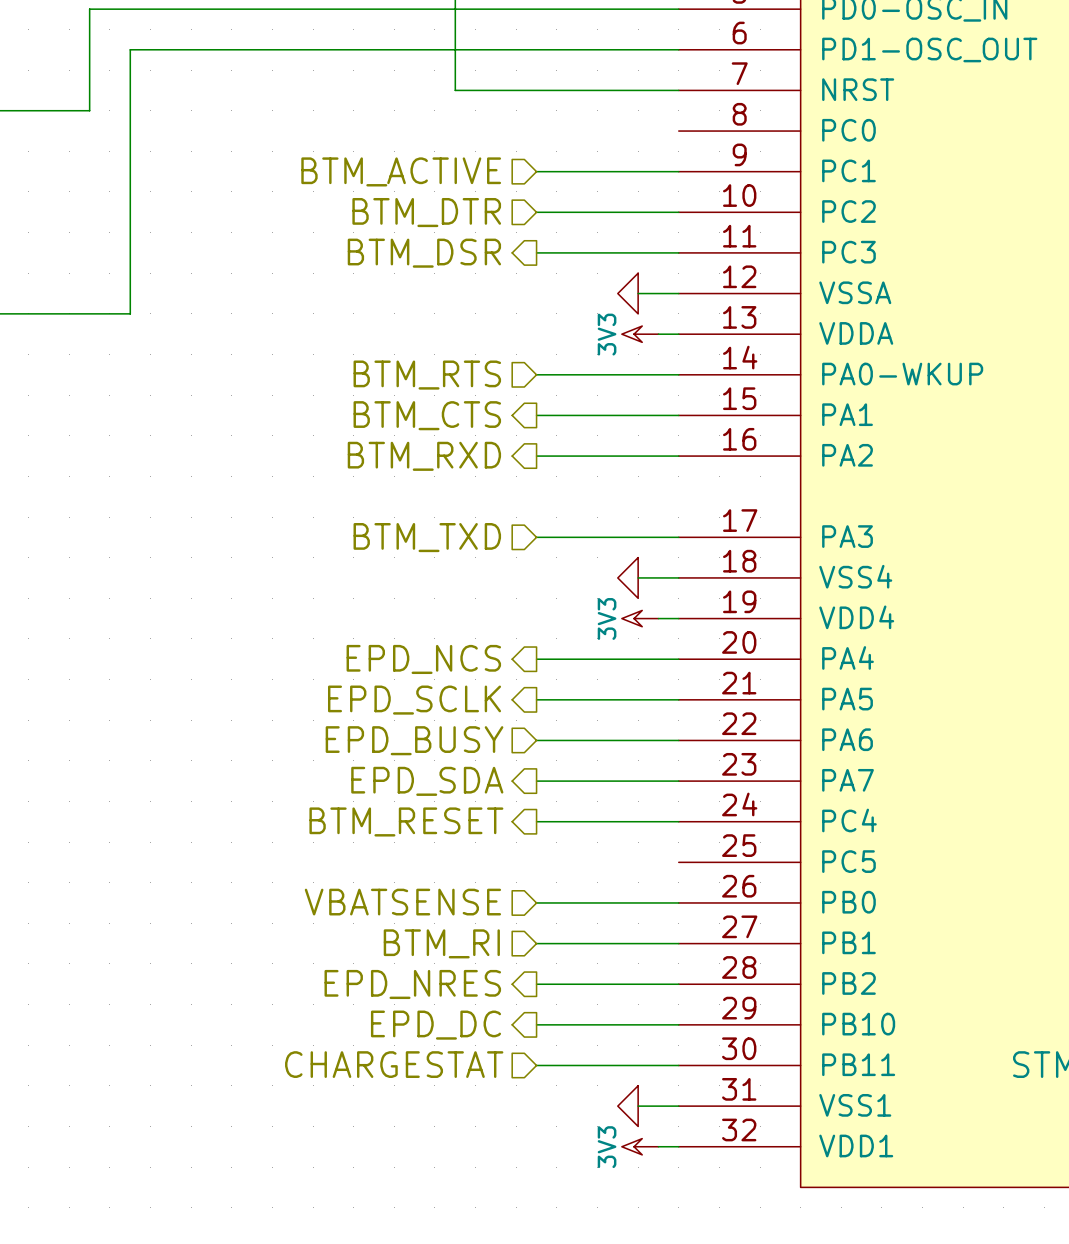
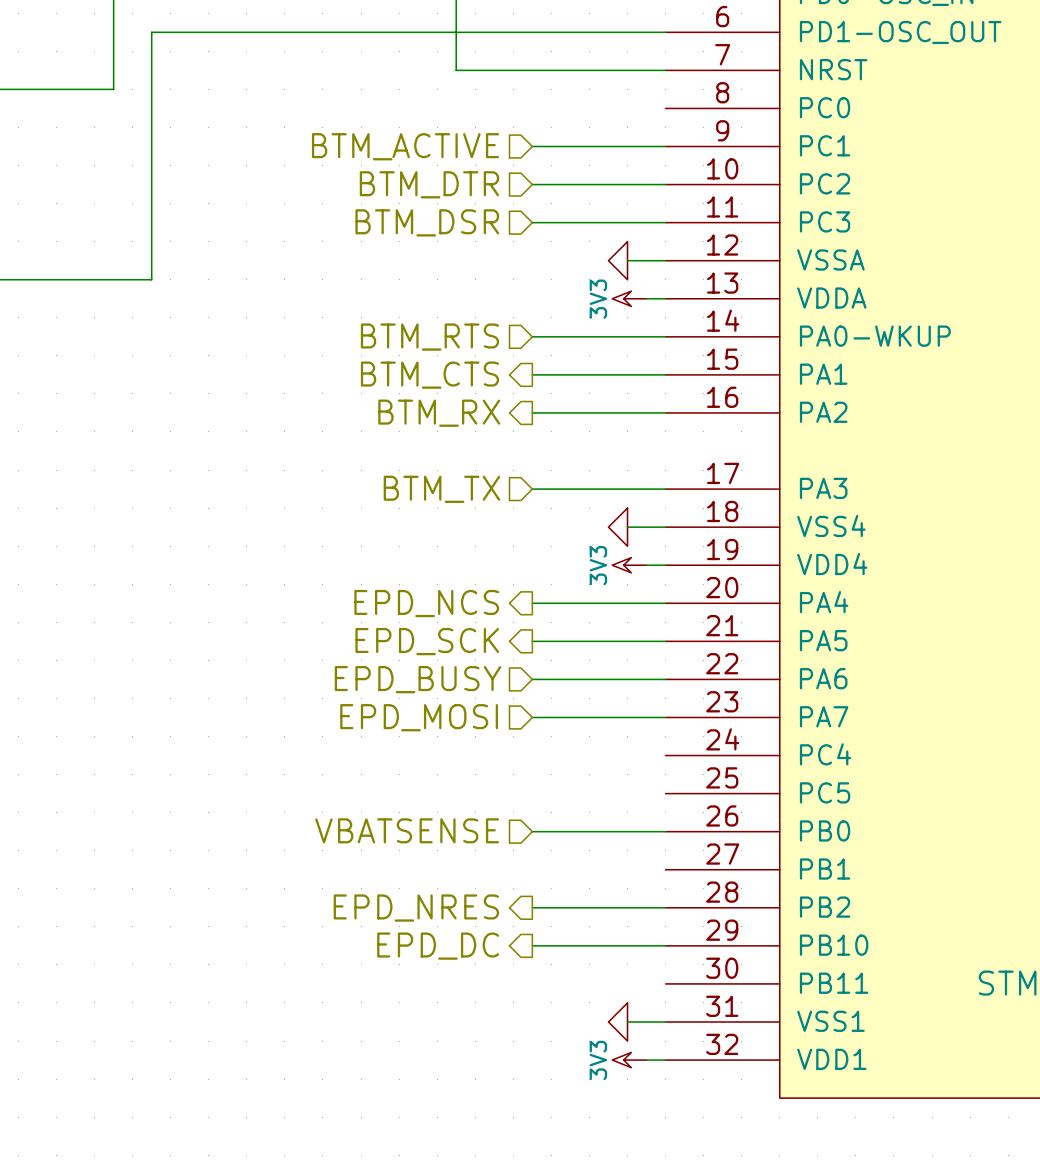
hierarchical label shape: output (424, 253) -> input (427, 222)
hierarchical label: BTM_RXD (424, 456) -> BTM_RX (439, 413)
hierarchical label: BTM_TXD (427, 537) -> BTM_TX (441, 489)
hierarchical label: EPD_SCLK (414, 700) -> EPD_SCK (427, 641)
hierarchical label shape: output (427, 781) -> input (419, 717)
hierarchical label: EPD_SDA (427, 781) -> EPD_MOSI (419, 717)
hierarchical label: BTM_RESET (406, 821) -> none
wire: (536, 821) (678, 821) -> none
hierarchical label: BTM_RI (441, 943) -> none
wire: (536, 943) (678, 943) -> none
hierarchical label: CHARGESTAT (394, 1064) -> none
wire: (536, 1065) (678, 1065) -> none

